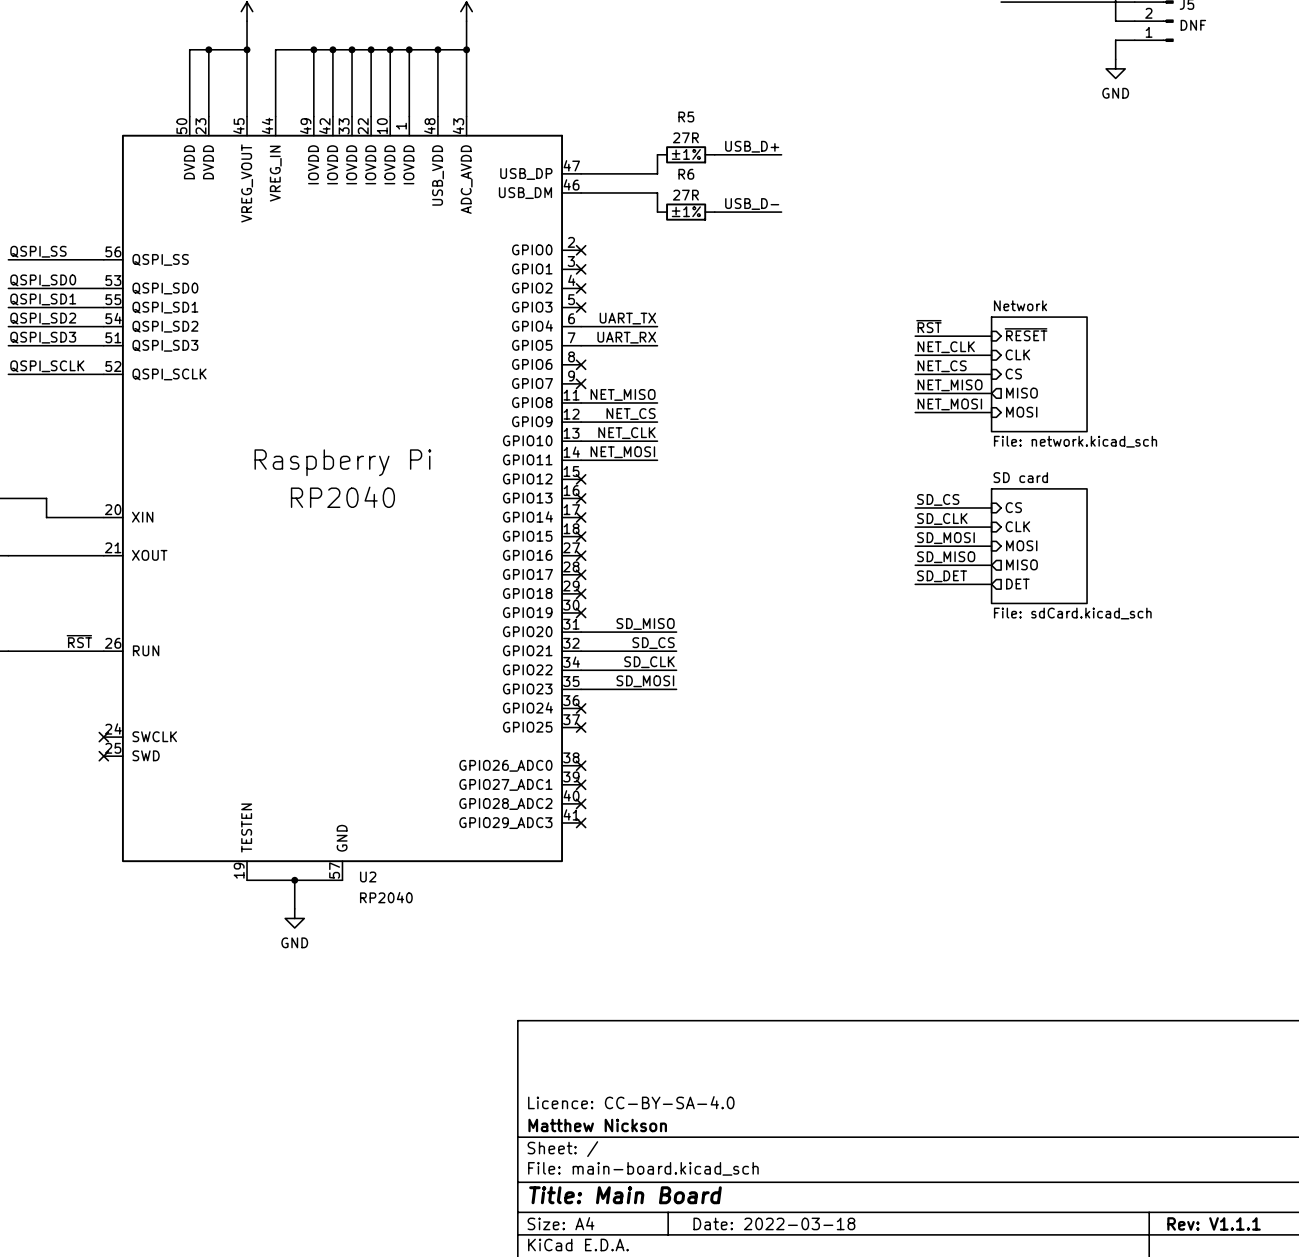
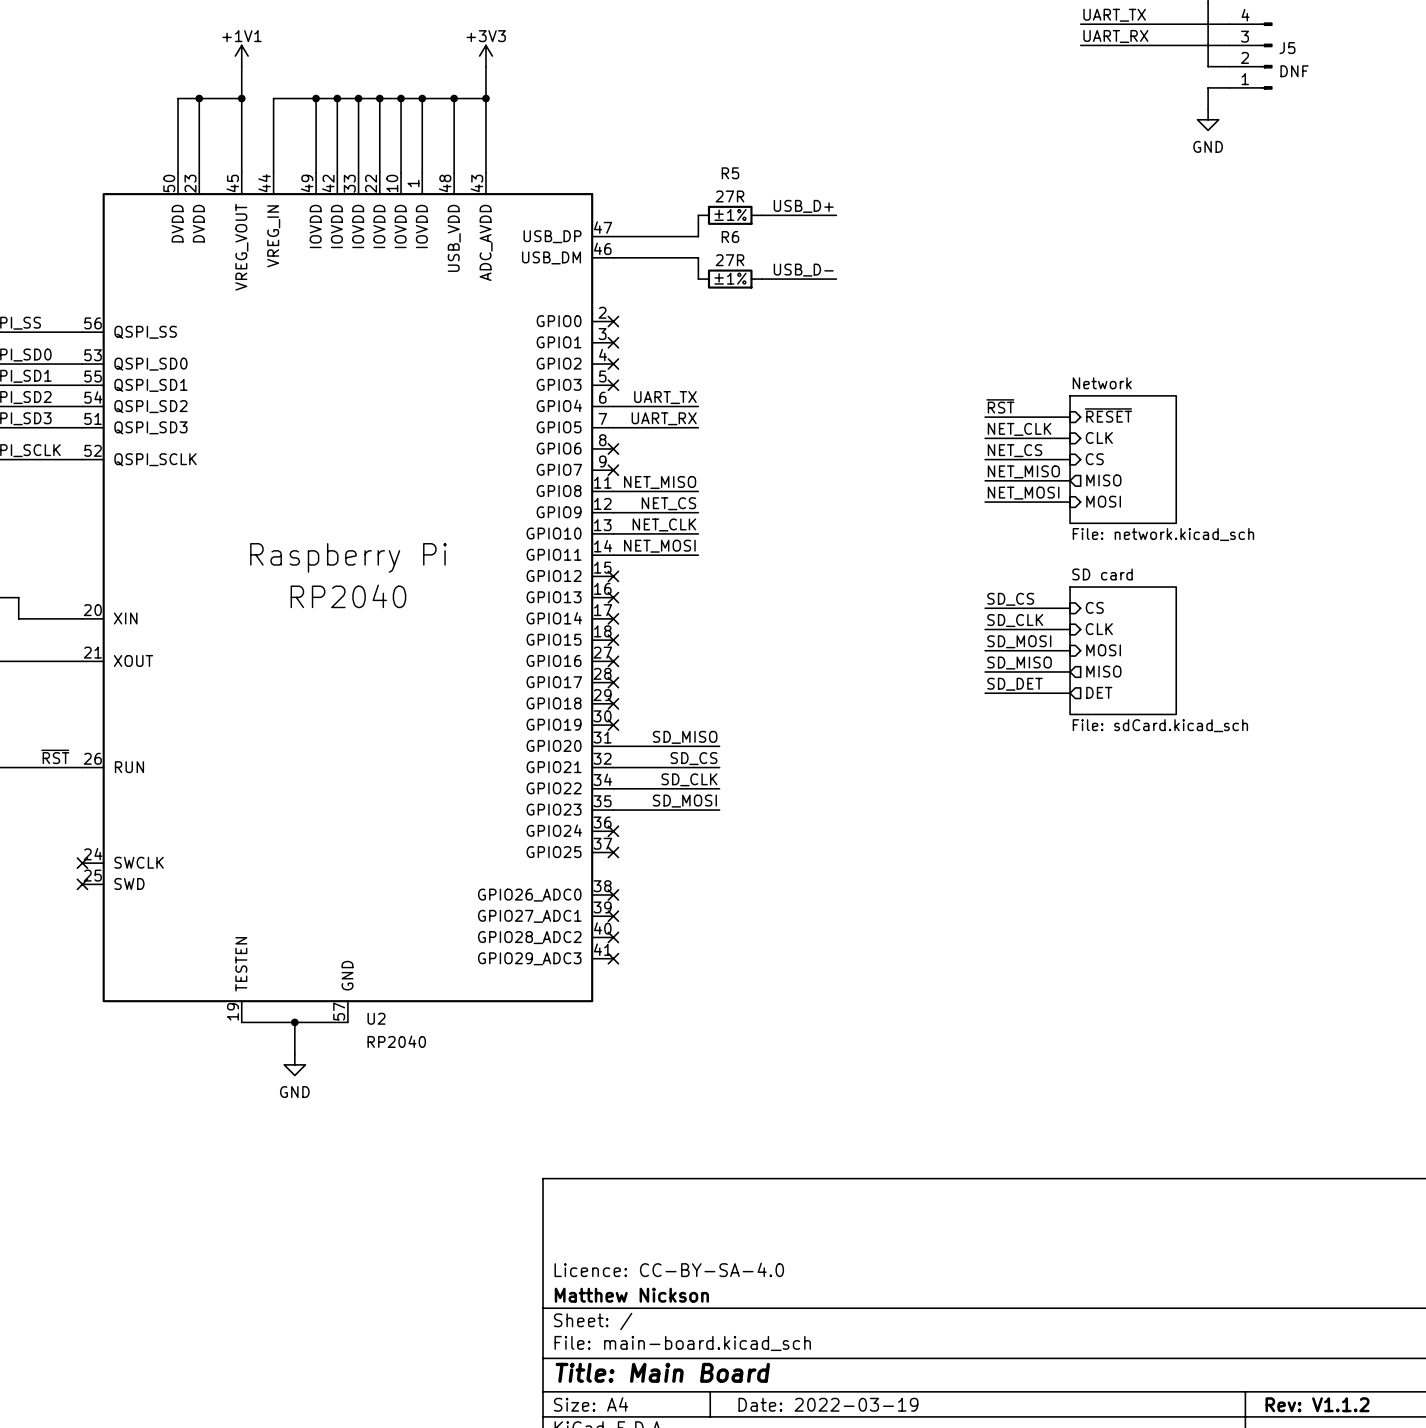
title block: Date: 2022-03-18 (774, 1223) -> Date: 2022-03-19 (828, 1404)
title block: Rev: V1.1.1 (1214, 1223) -> Rev: V1.1.2 (1317, 1404)

